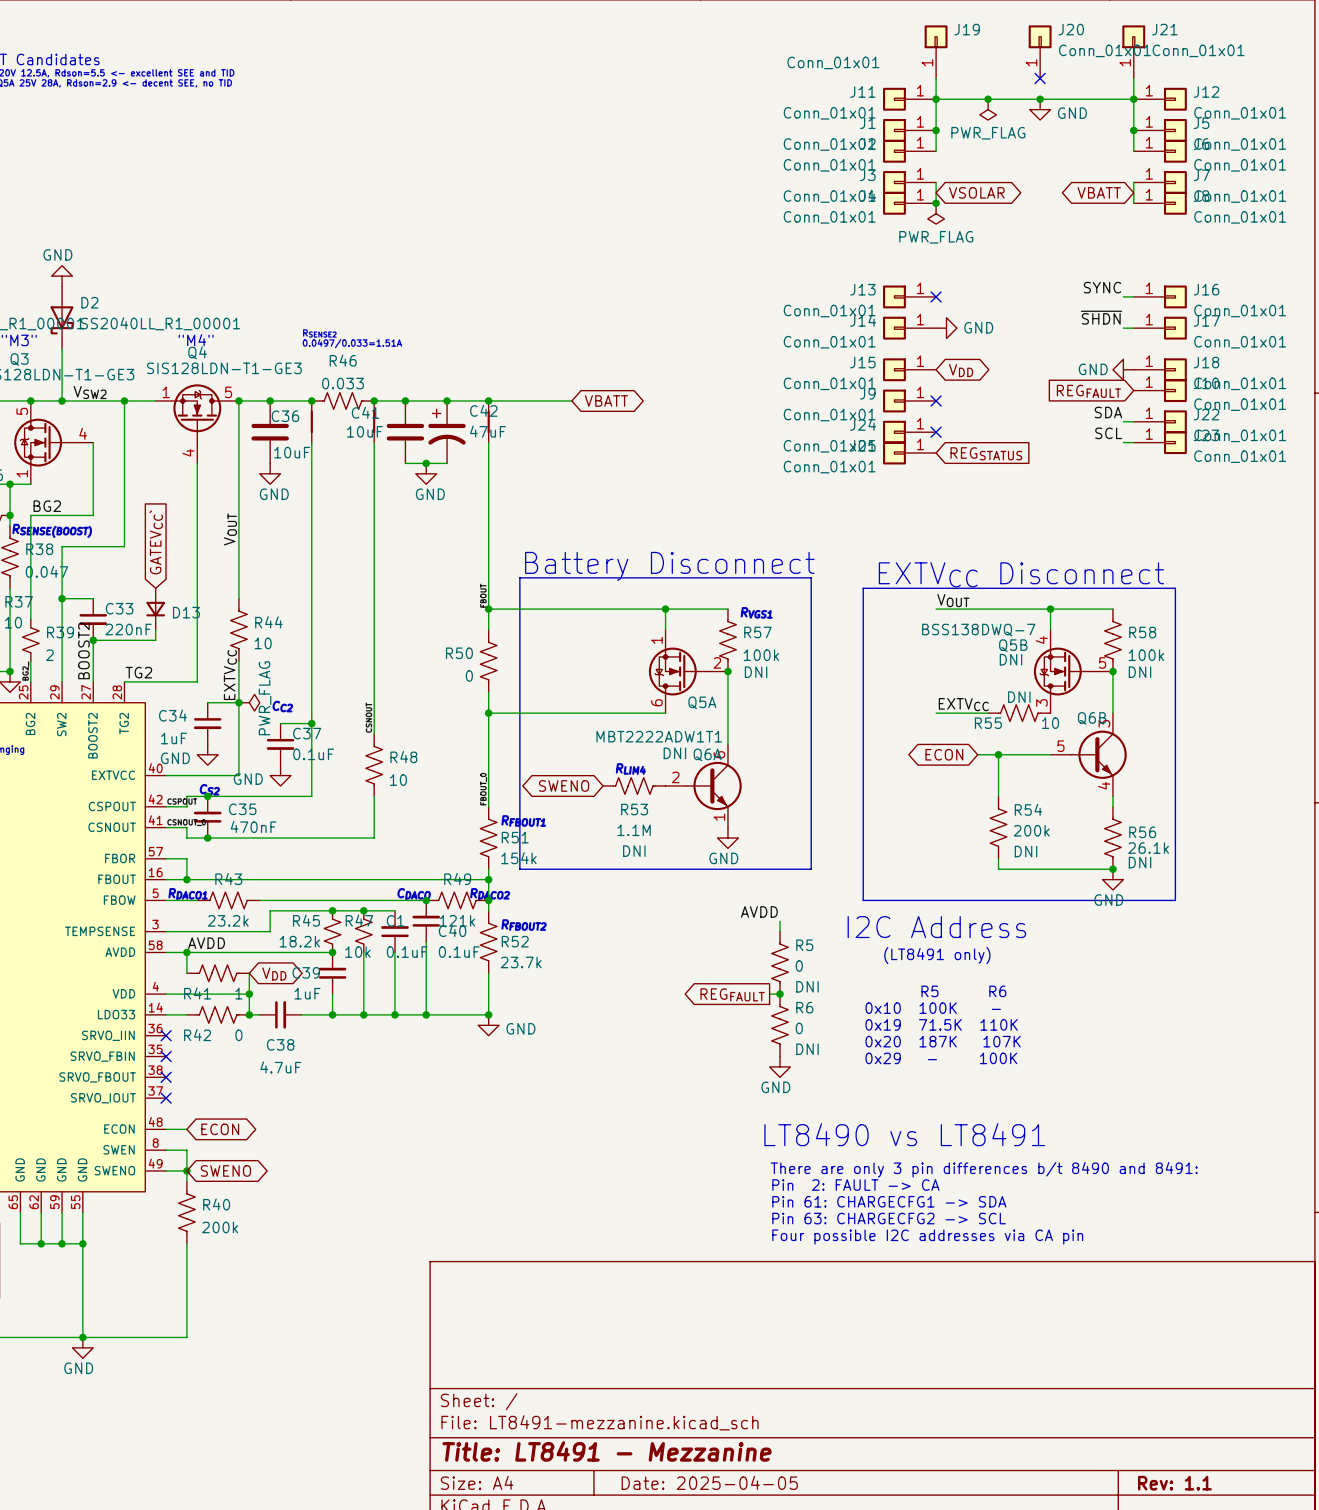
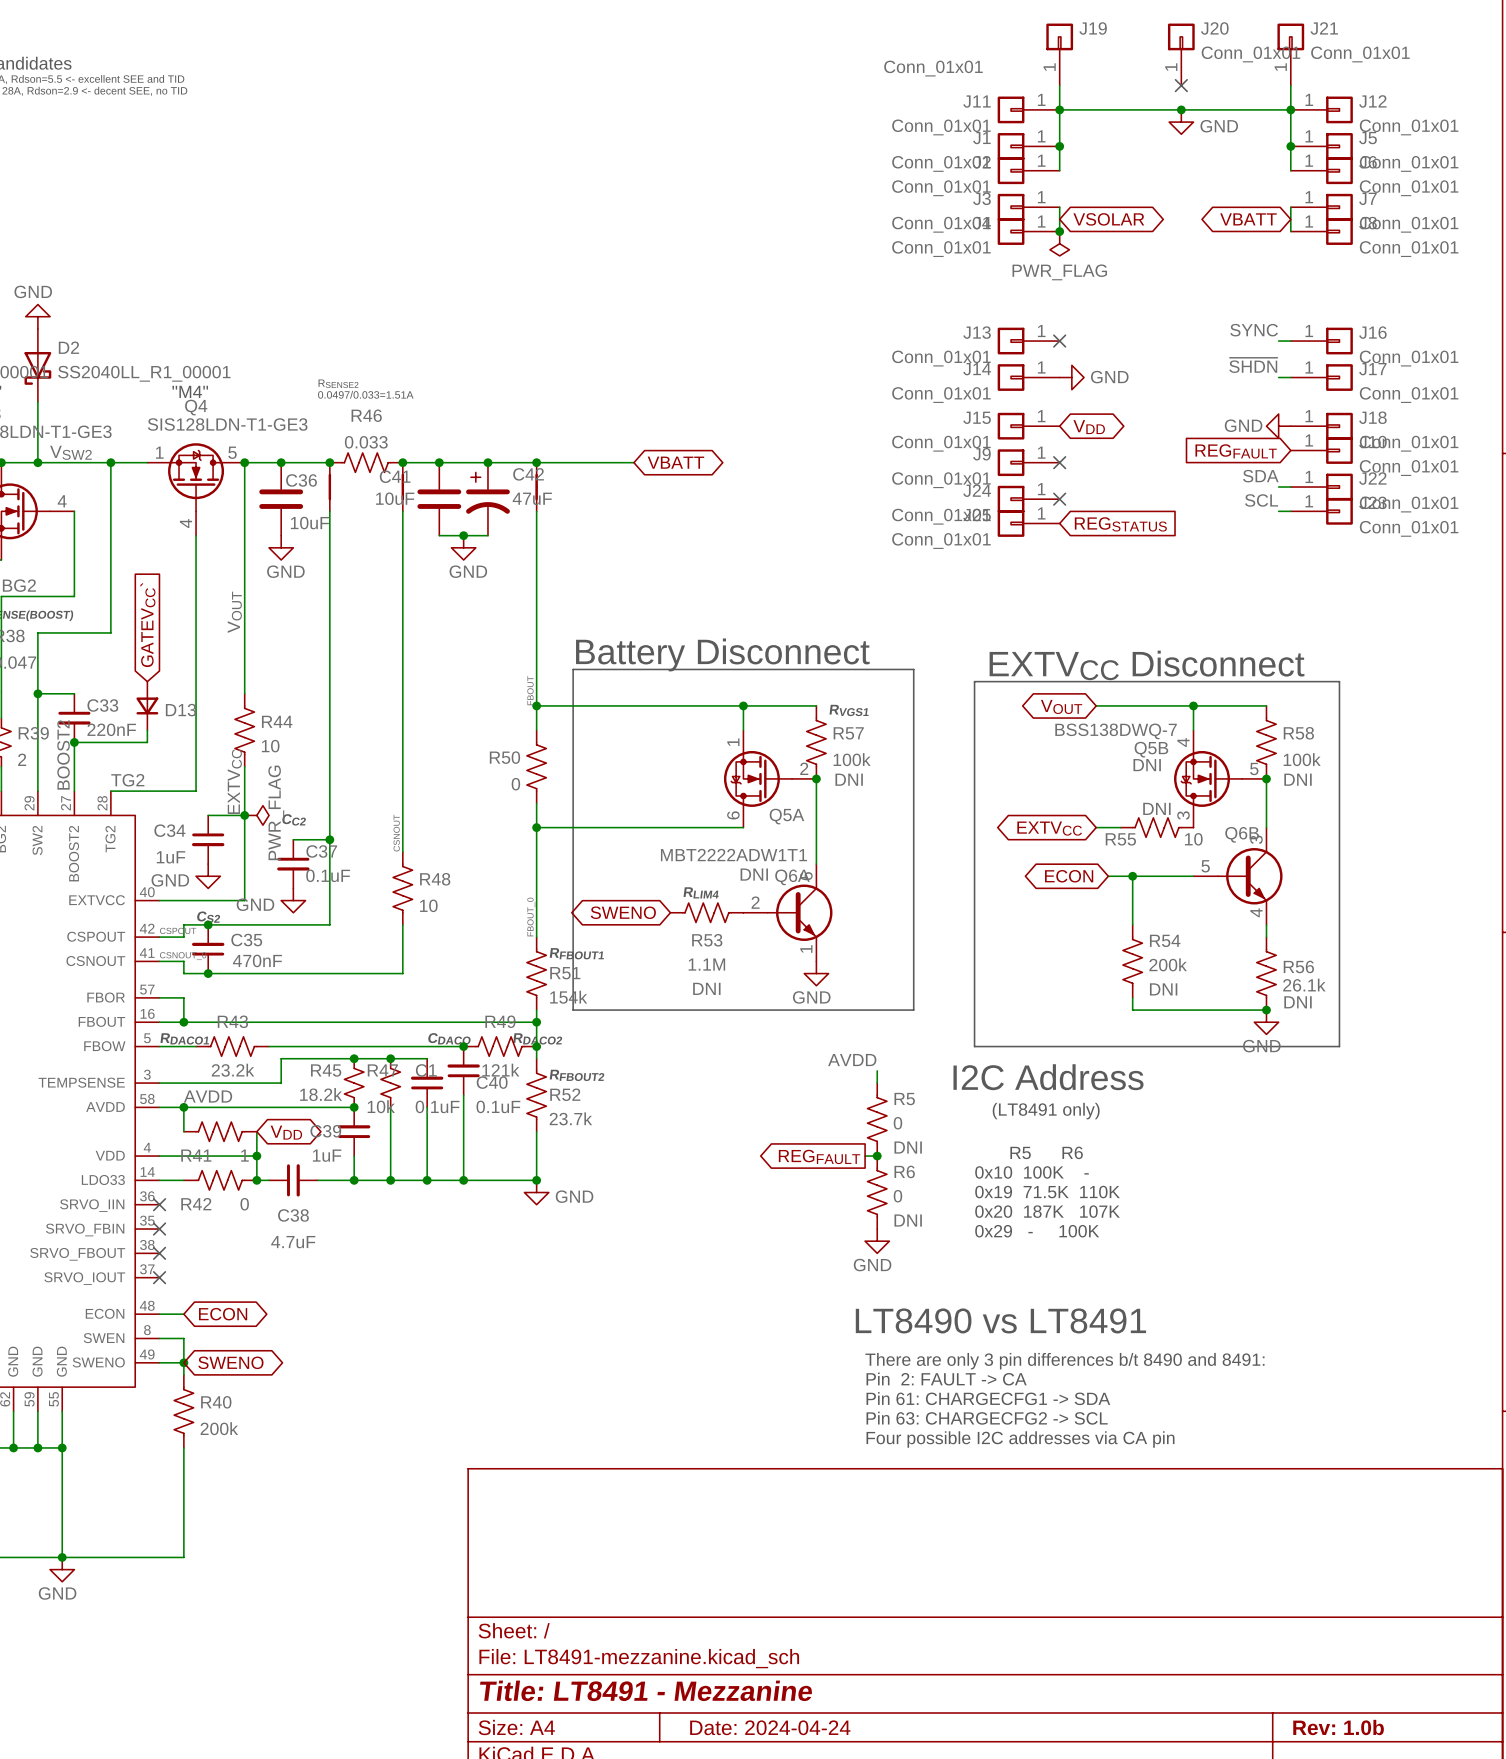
junction: (988, 99) -> none
power symbol: PWR_FLAG (988, 109) -> none
label: VOUT (953, 600) -> none
wire: (936, 609) (967, 609) -> none
global label: none -> VOUT (1061, 706)
label: EXTVCC (963, 704) -> none
global label: none -> EXTVCC (1049, 828)
wire: (936, 713) (967, 713) -> none
title block: Date: 2025-04-05 (709, 1482) -> Date: 2024-04-24 (770, 1727)
title block: Rev: 1.1 (1174, 1483) -> Rev: 1.0b (1338, 1727)

